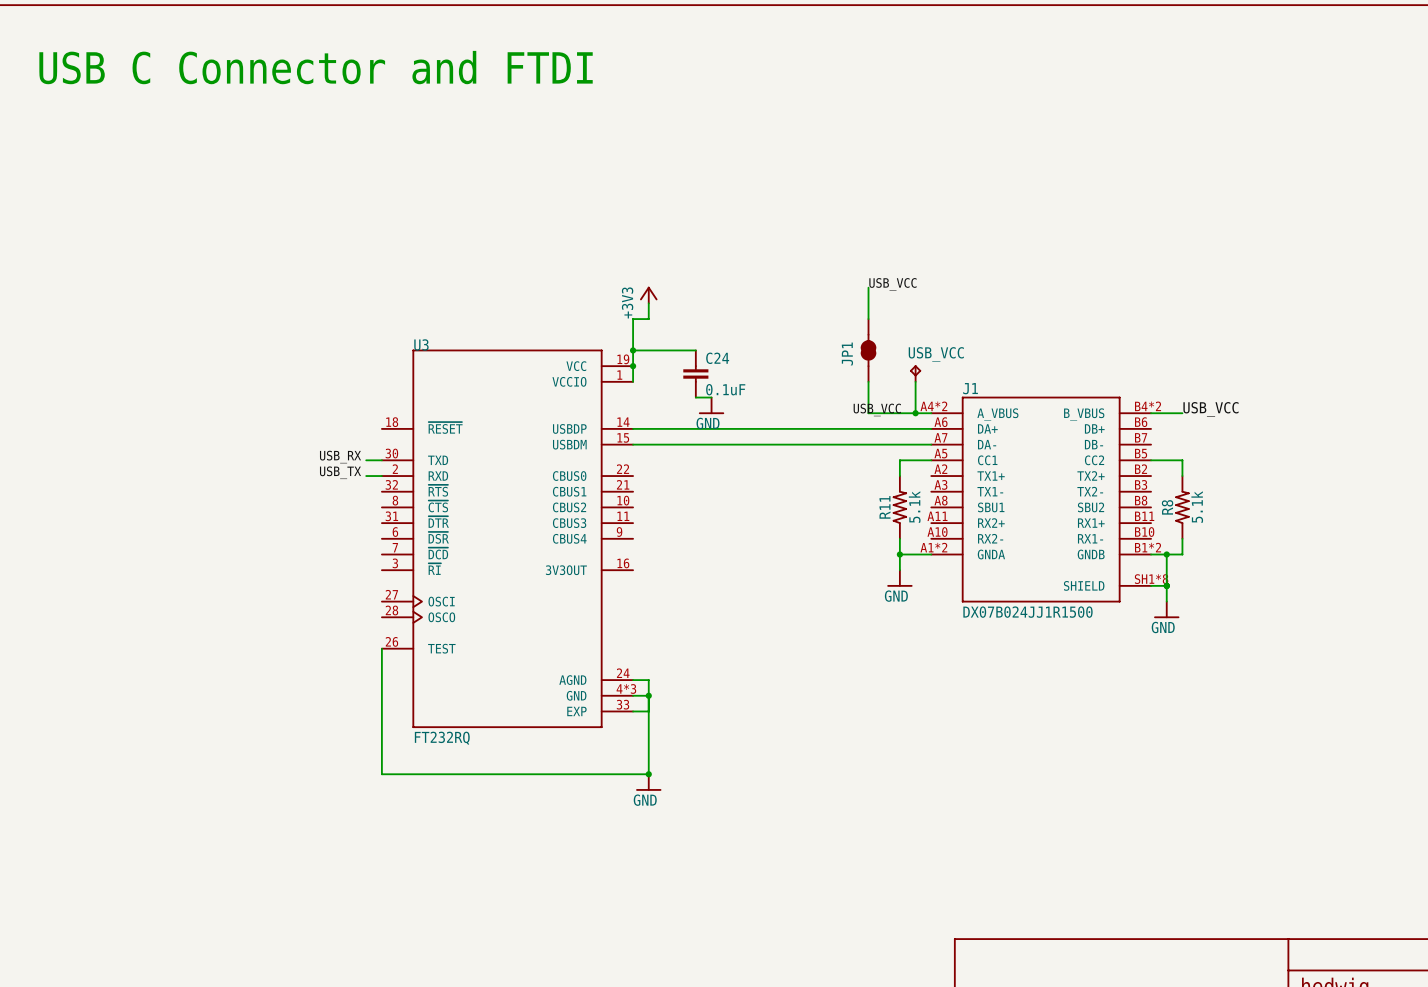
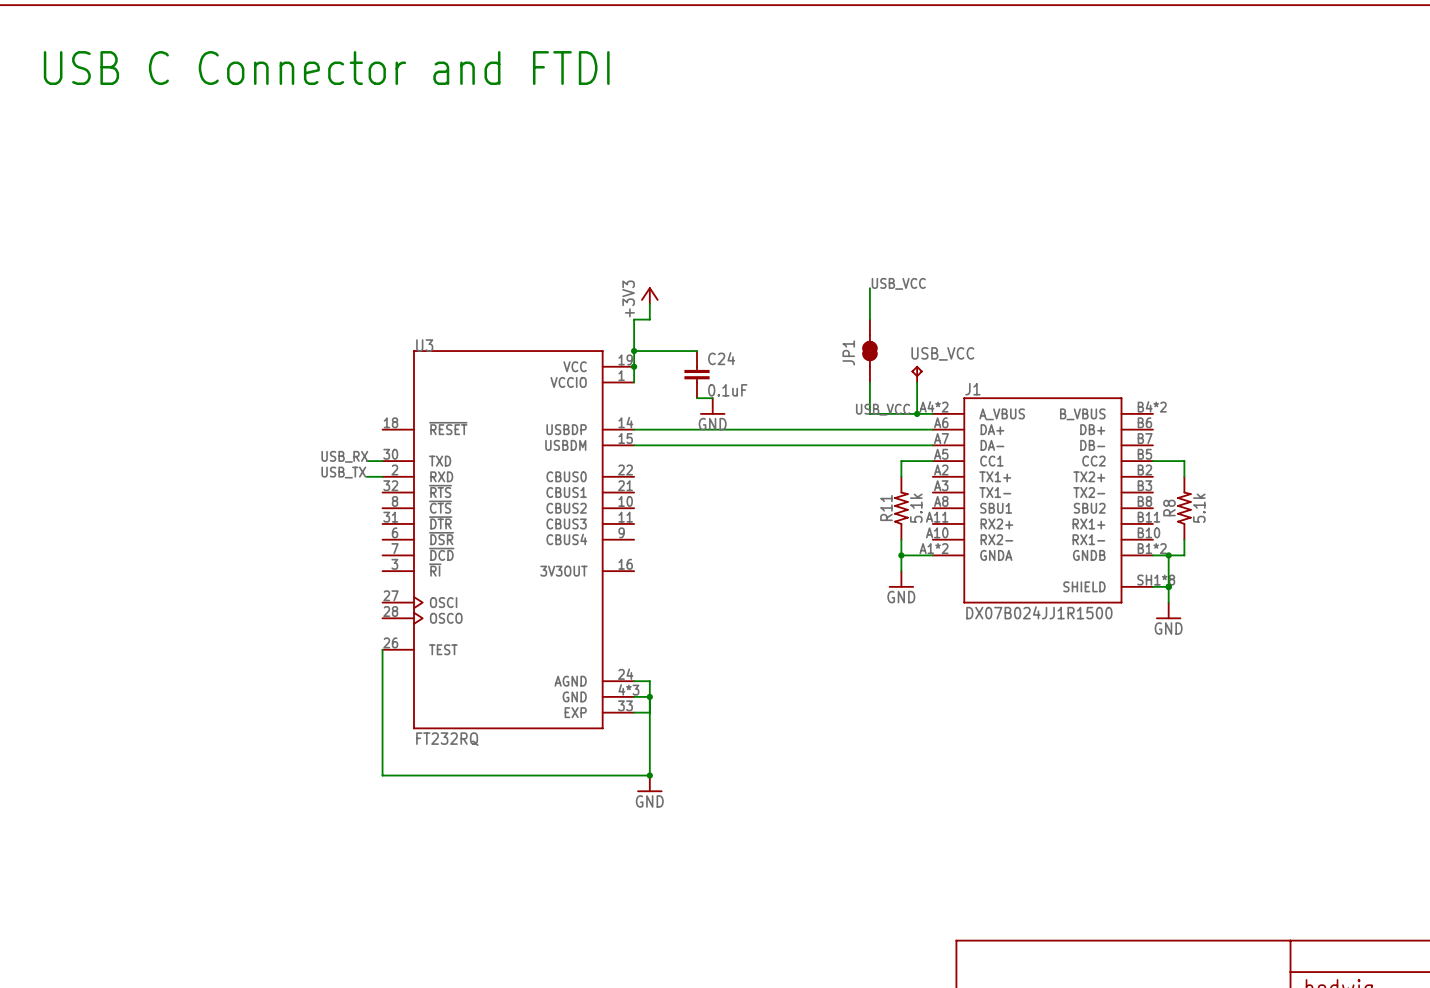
label: USB_VCC (1210, 409) -> none
wire: (1151, 413) (1182, 413) -> none

